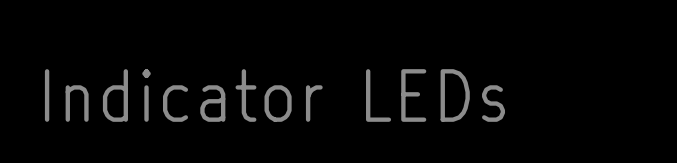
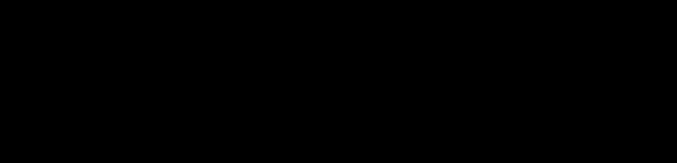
text: Indicator LEDs (274, 95) -> none

